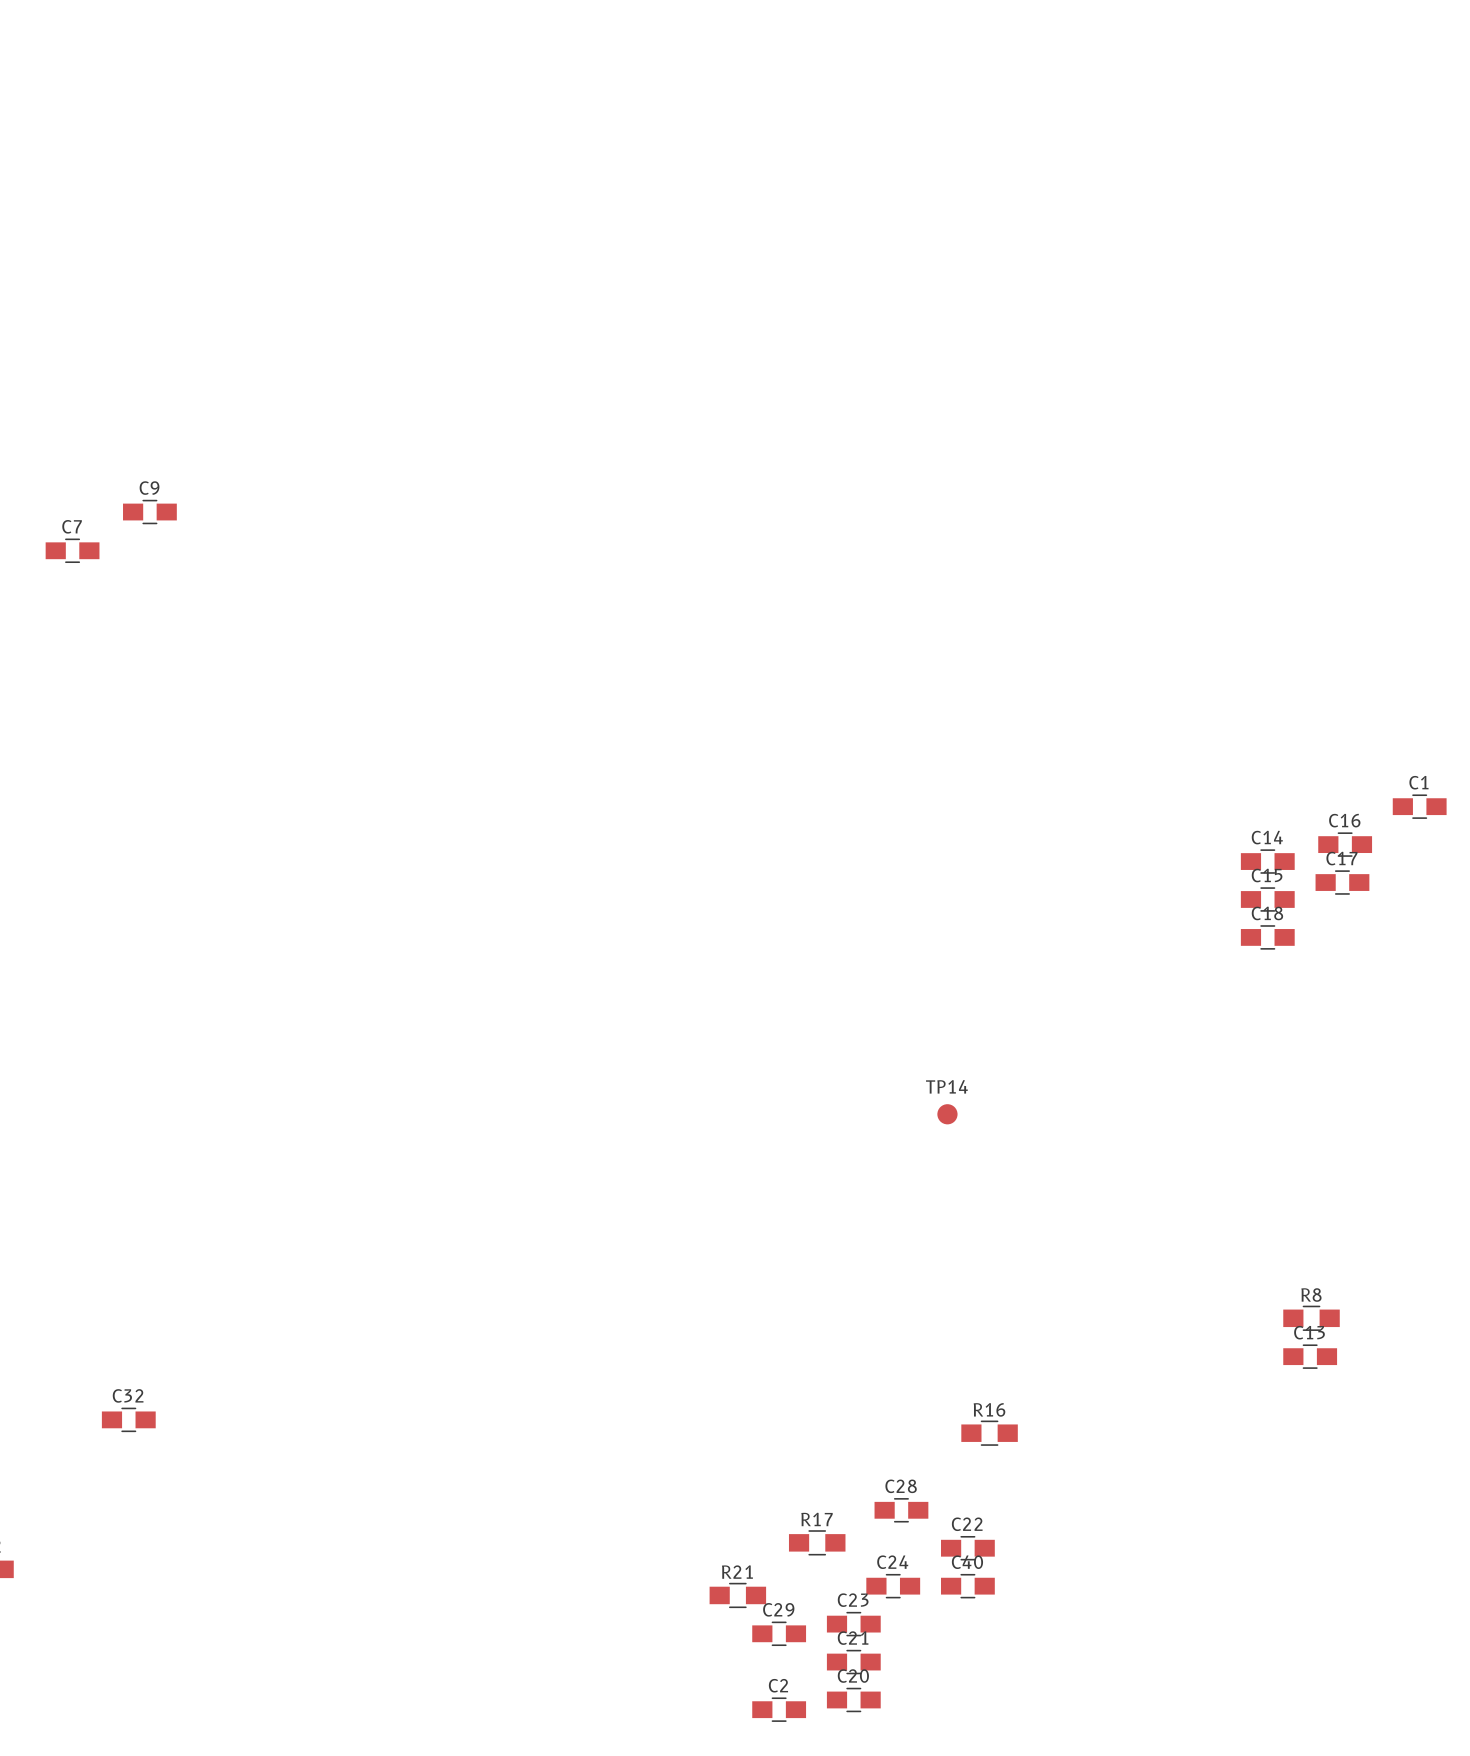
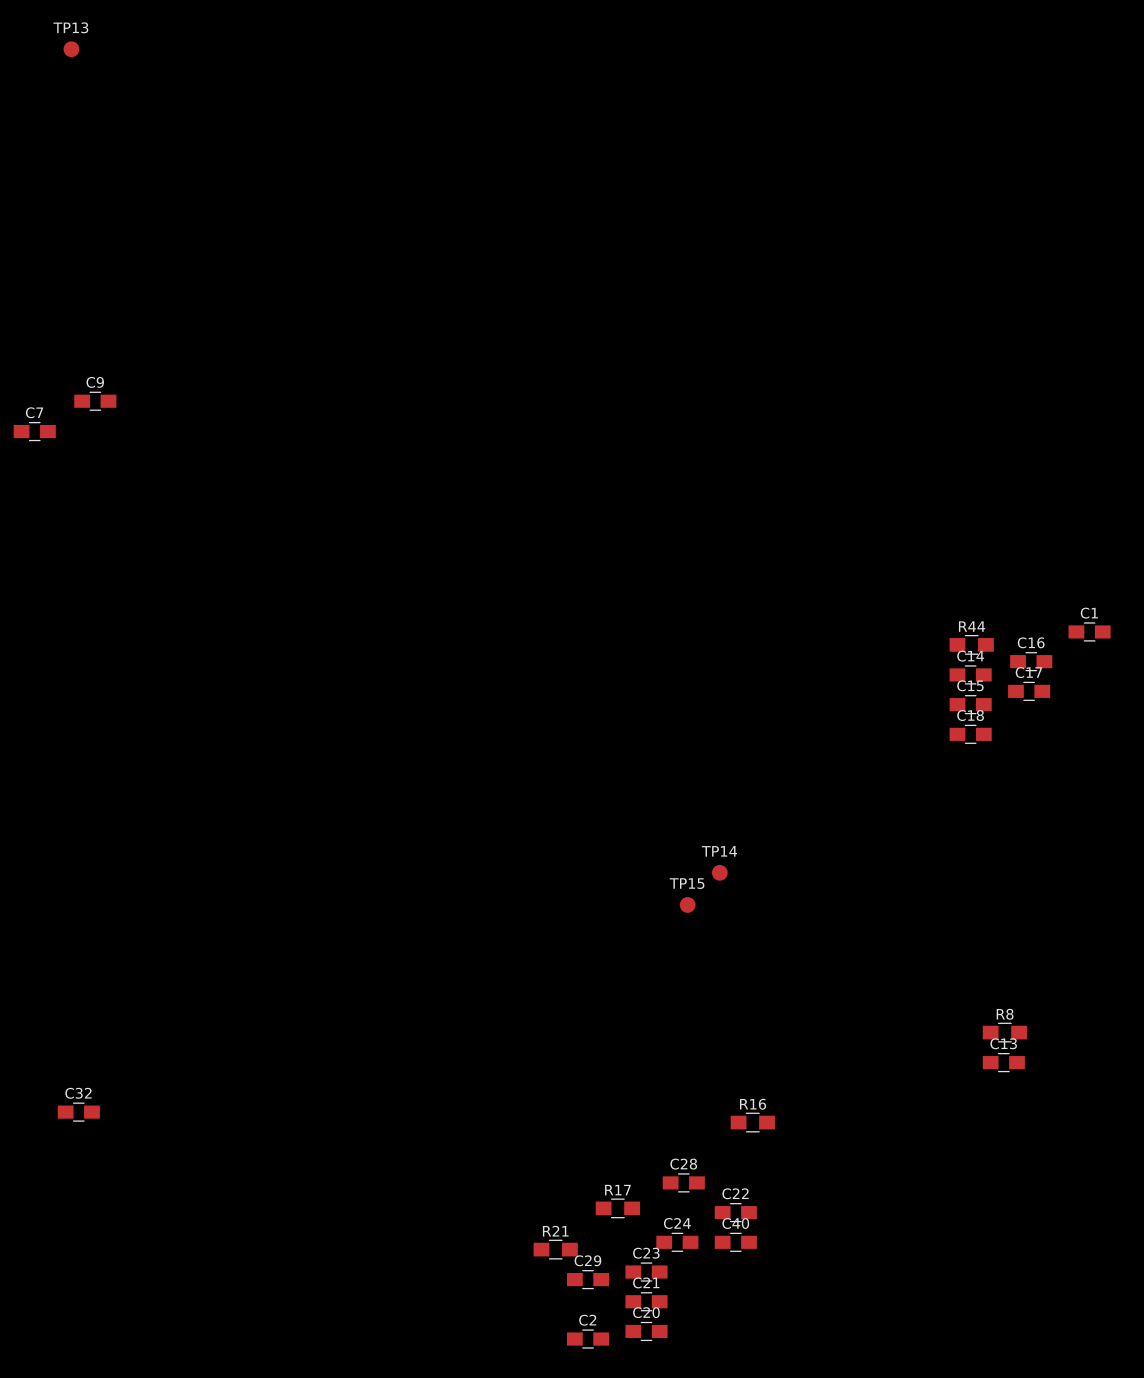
TP13: none -> (71, 49)
R44: none -> (971, 644)
TP15: none -> (687, 904)

